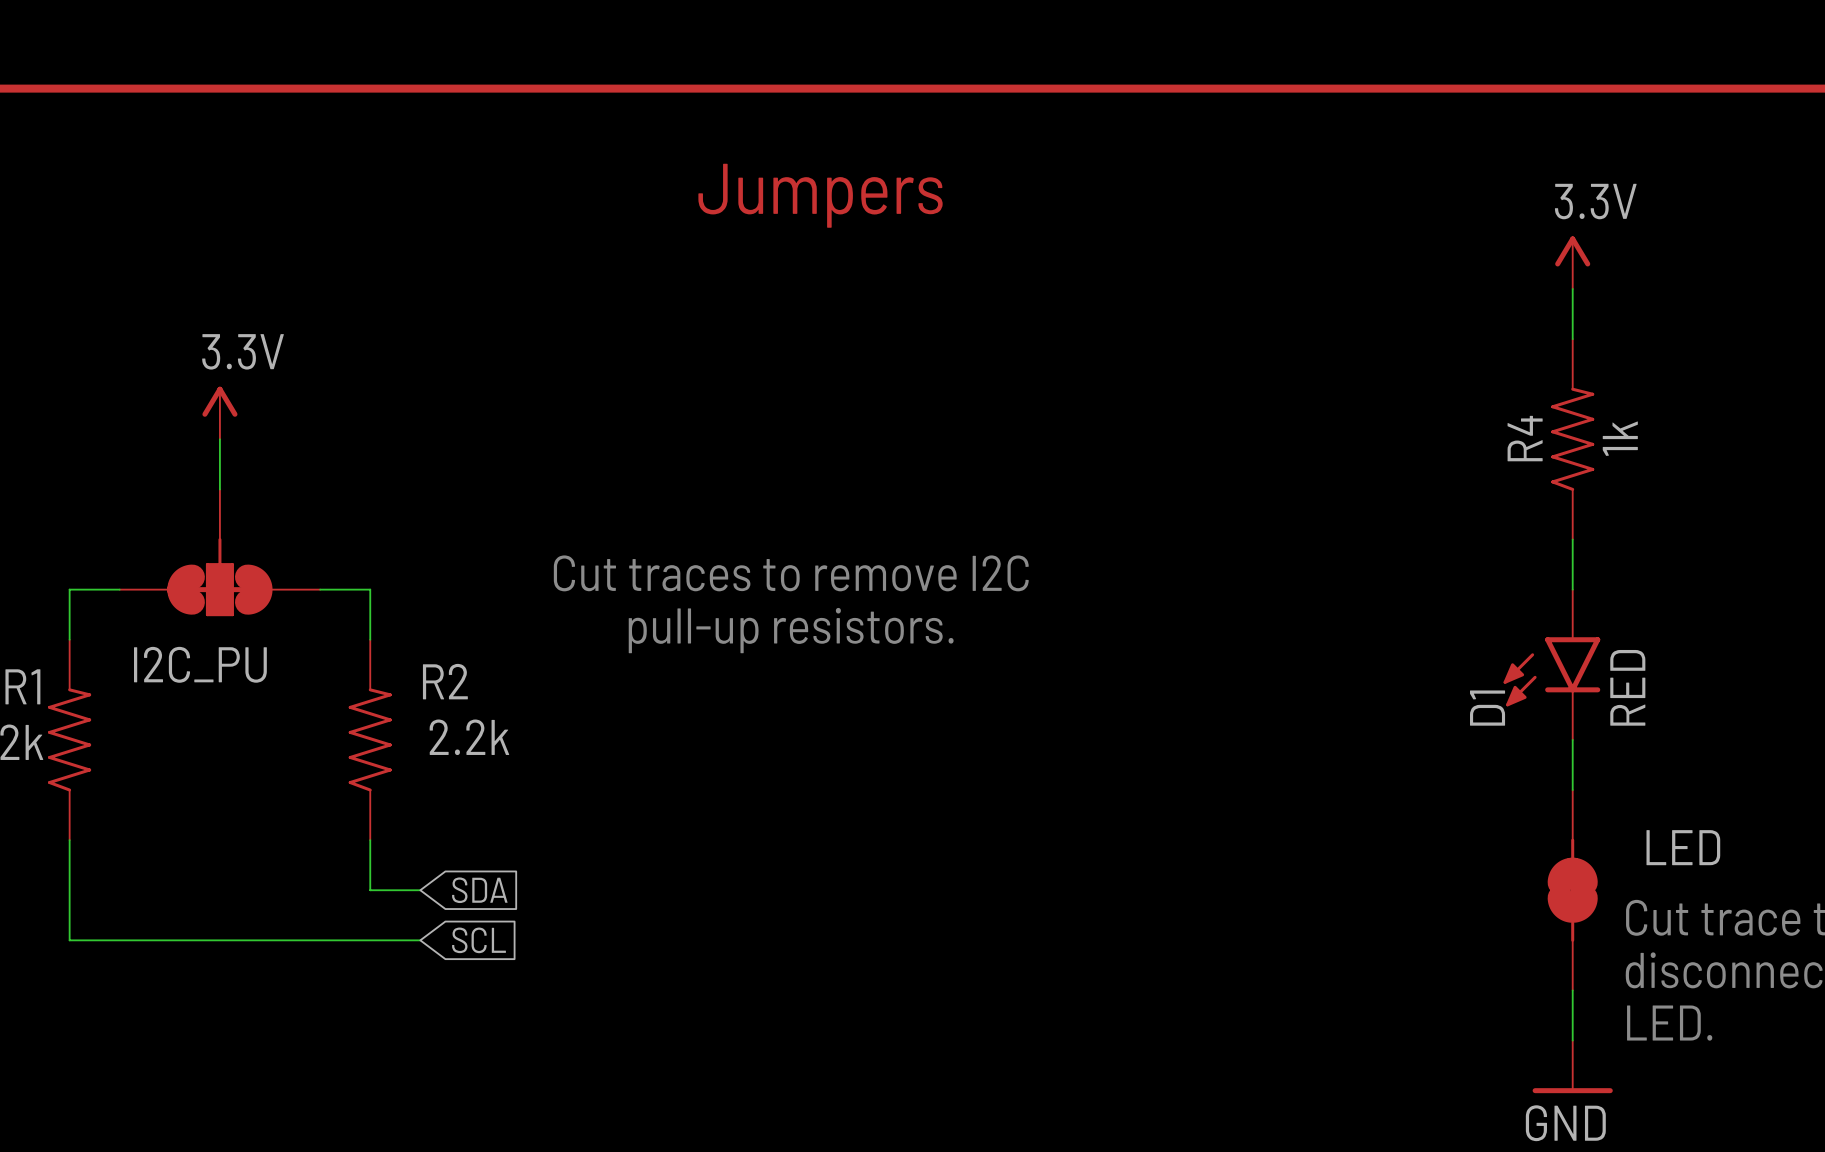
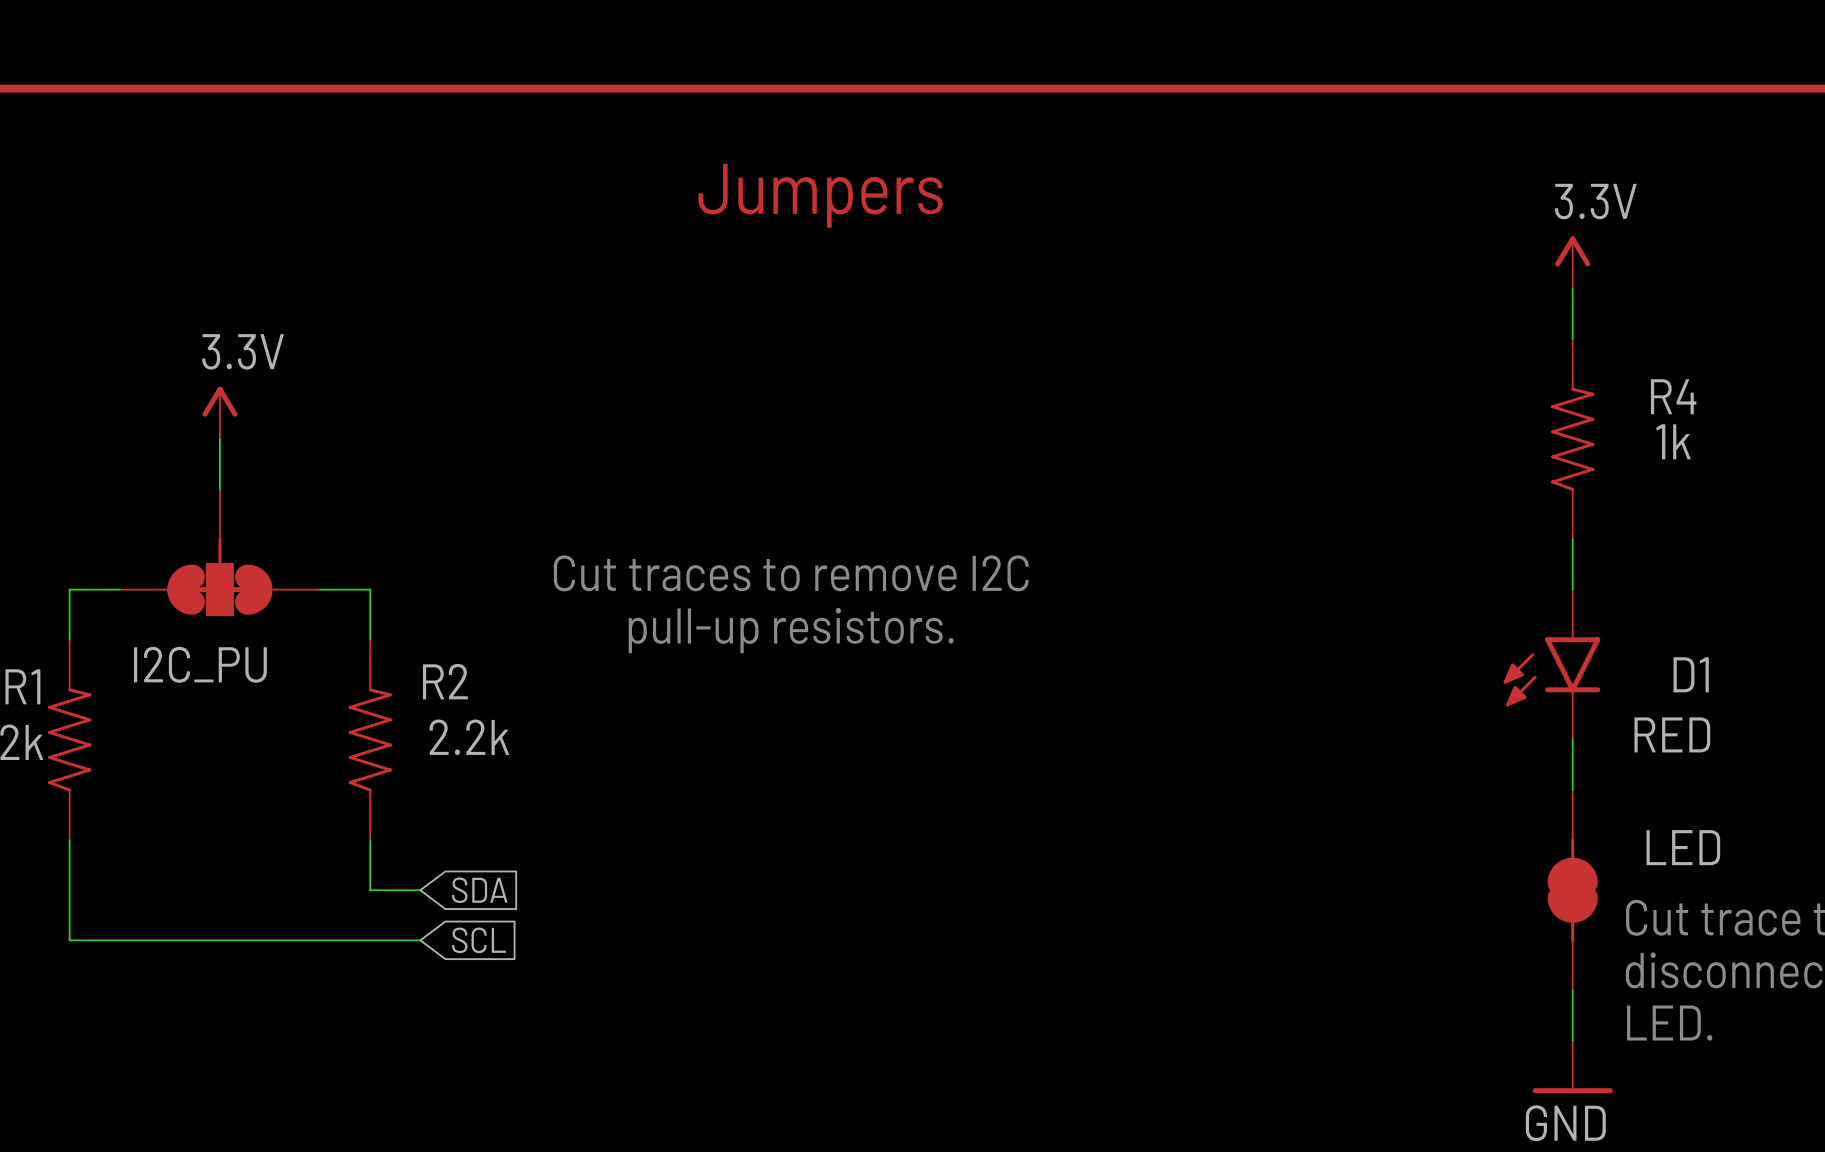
R4 name rotation: 0° (1525, 438) -> 90° clockwise (1673, 396)
R4 name position: R4 (1525, 438) -> R4 (1673, 396)
R4 value rotation: 0° (1620, 438) -> 90° clockwise (1673, 441)
D1 value rotation: 0° (1627, 687) -> 90° clockwise (1672, 734)
D1 name rotation: 0° (1487, 708) -> 90° clockwise (1691, 674)
D1 name position: D1 (1487, 708) -> D1 (1691, 674)

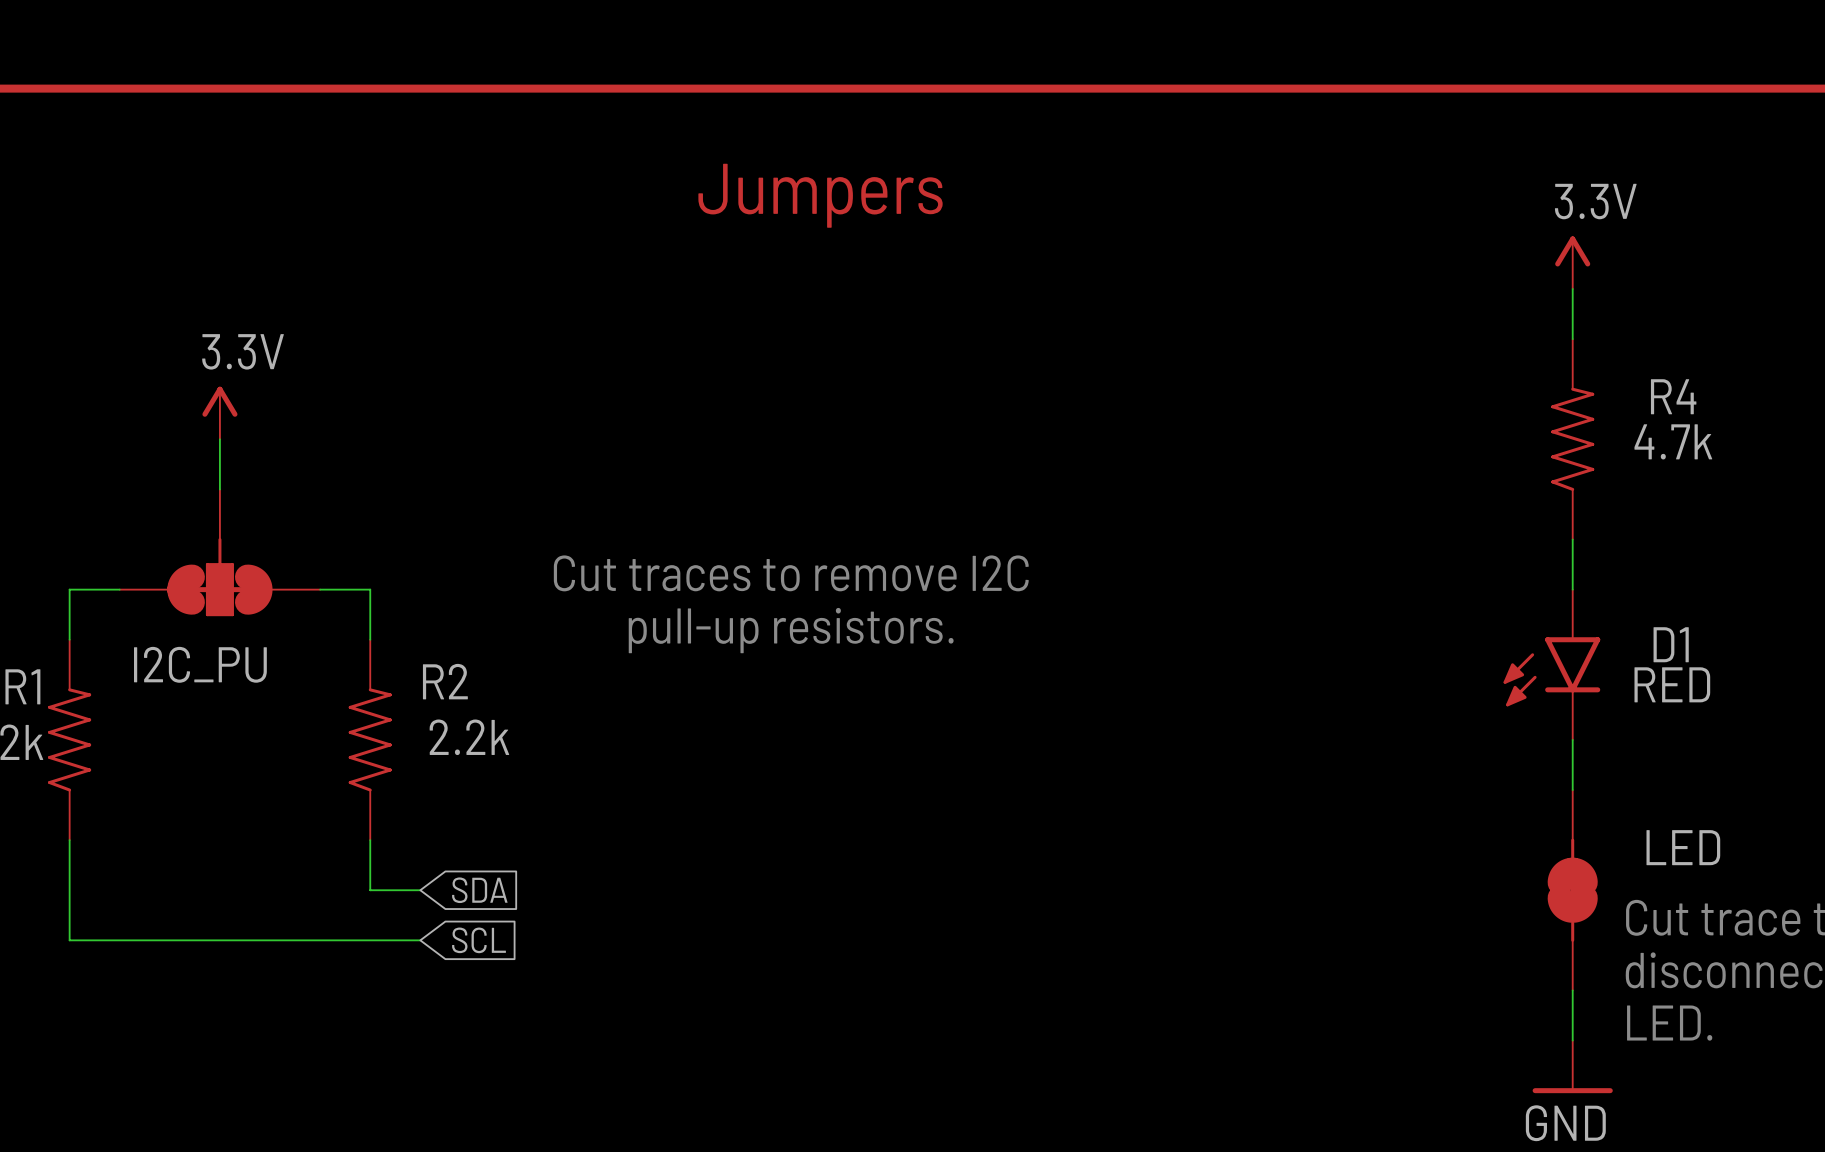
R4 value: 1k (1673, 441) -> 4.7k (1673, 441)
D1 name position: D1 (1691, 674) -> D1 (1671, 644)
D1 value position: RED (1672, 734) -> RED (1672, 684)

